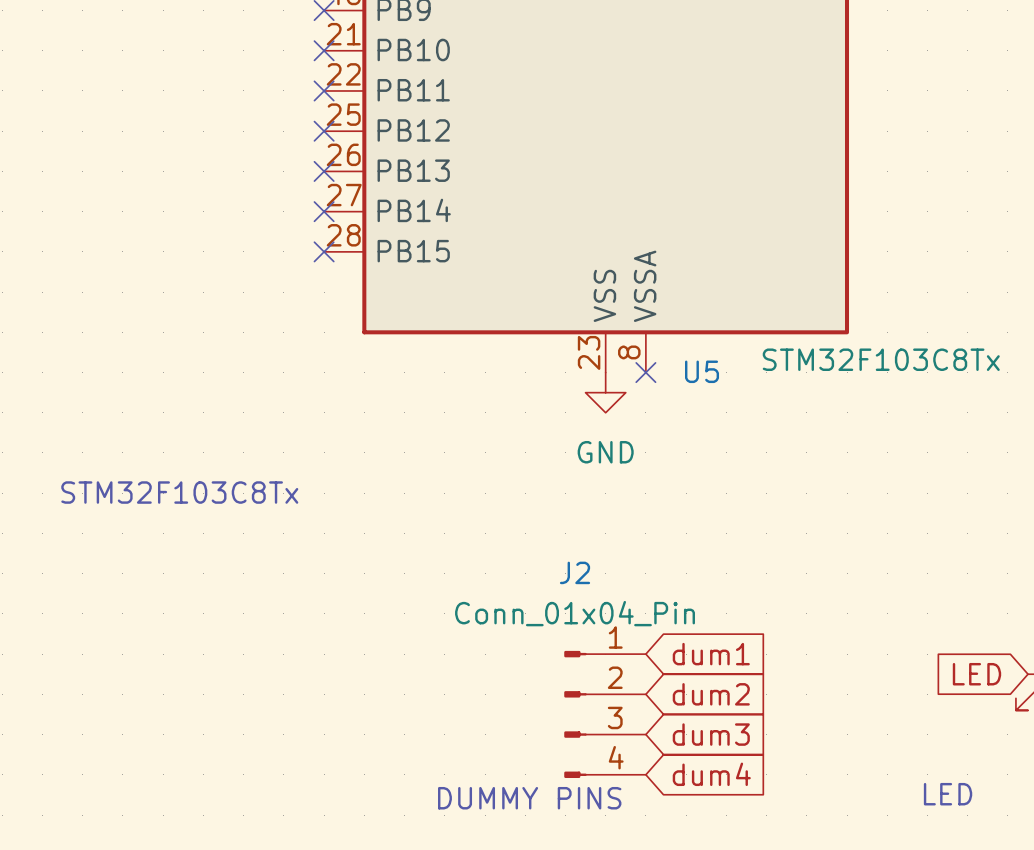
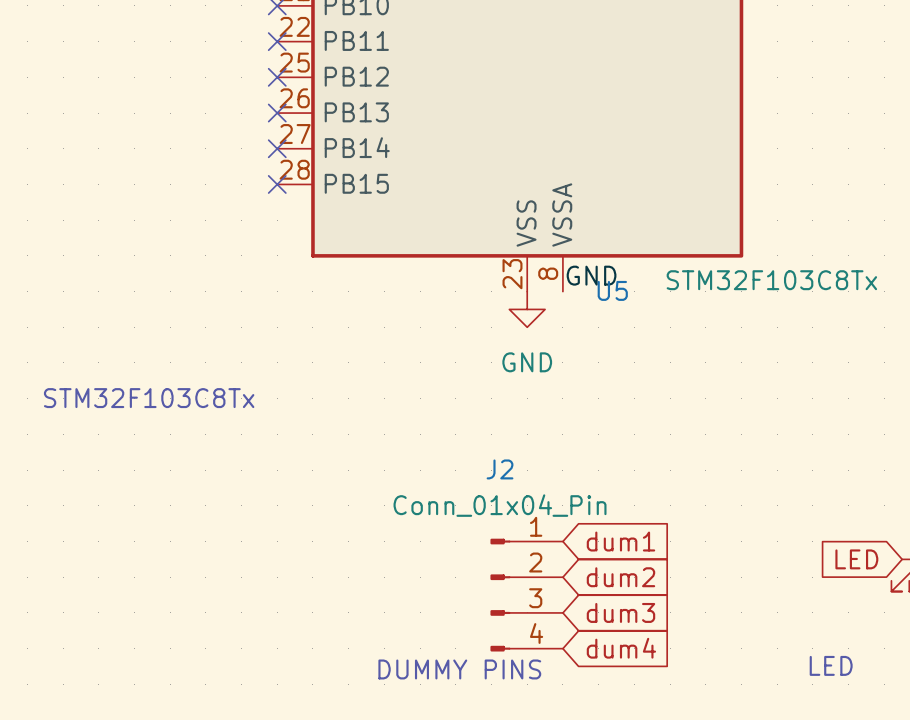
label: none -> GND (591, 275)
no-connect mark: (645, 372) -> none

